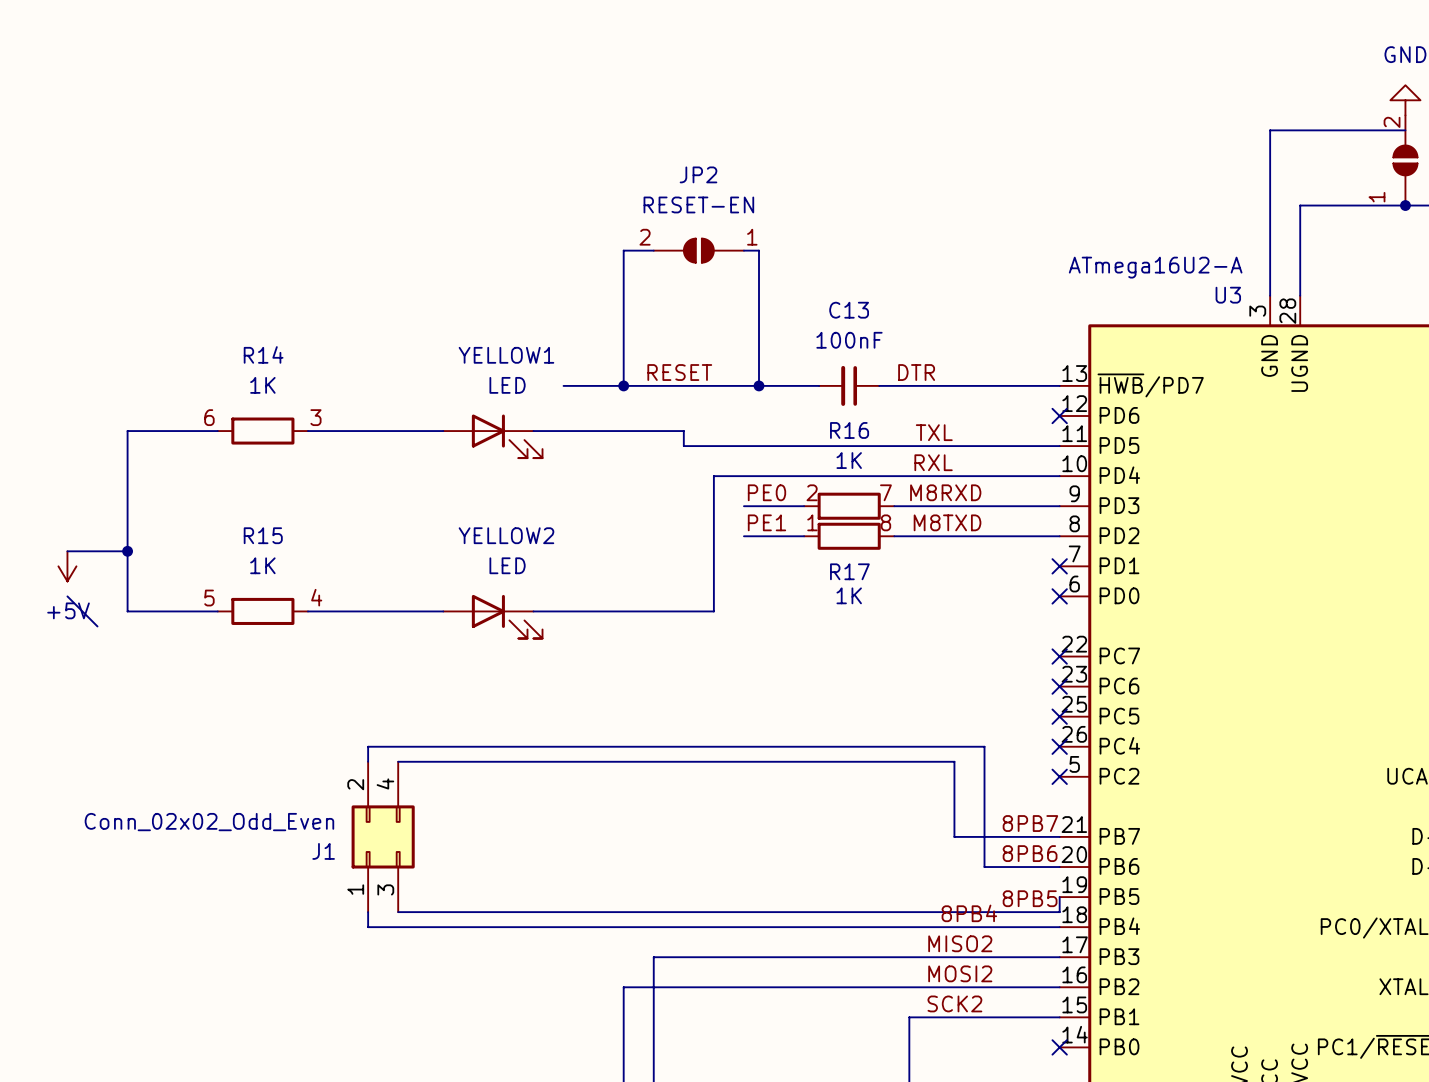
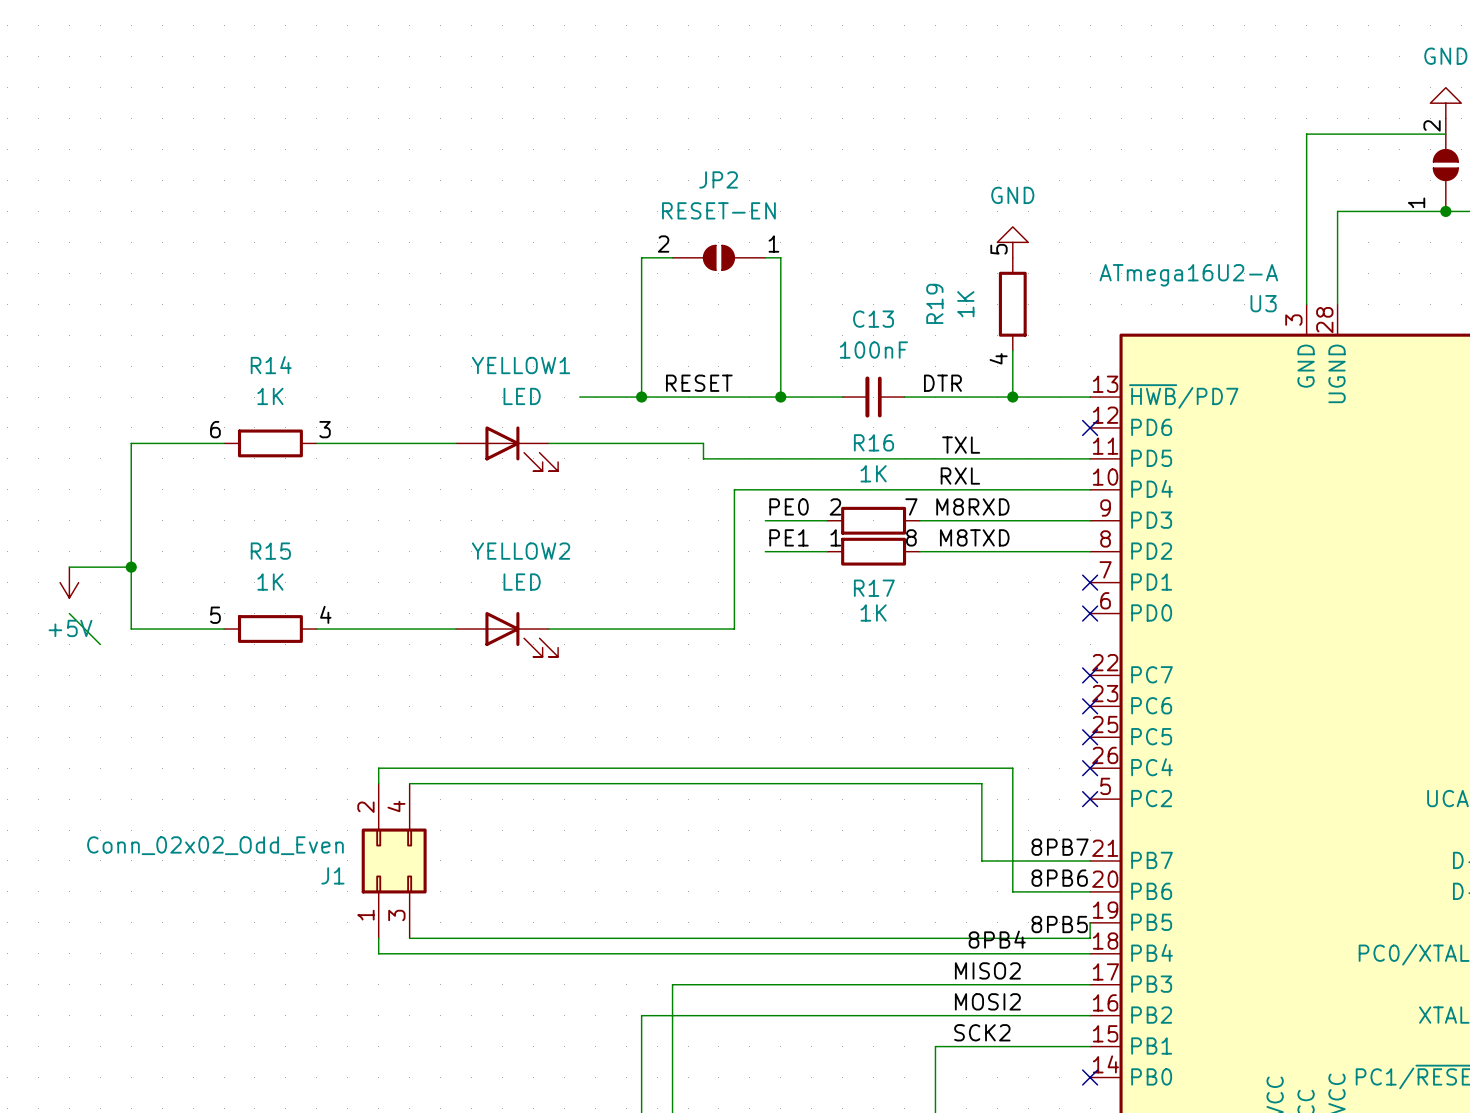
power symbol: none -> GND (1012, 242)
label: none -> 5 (998, 249)
R19: none -> 1K (1012, 304)
wire: none -> (1012, 350) (1012, 397)
label: none -> 4 (998, 358)
junction: none -> (1012, 397)

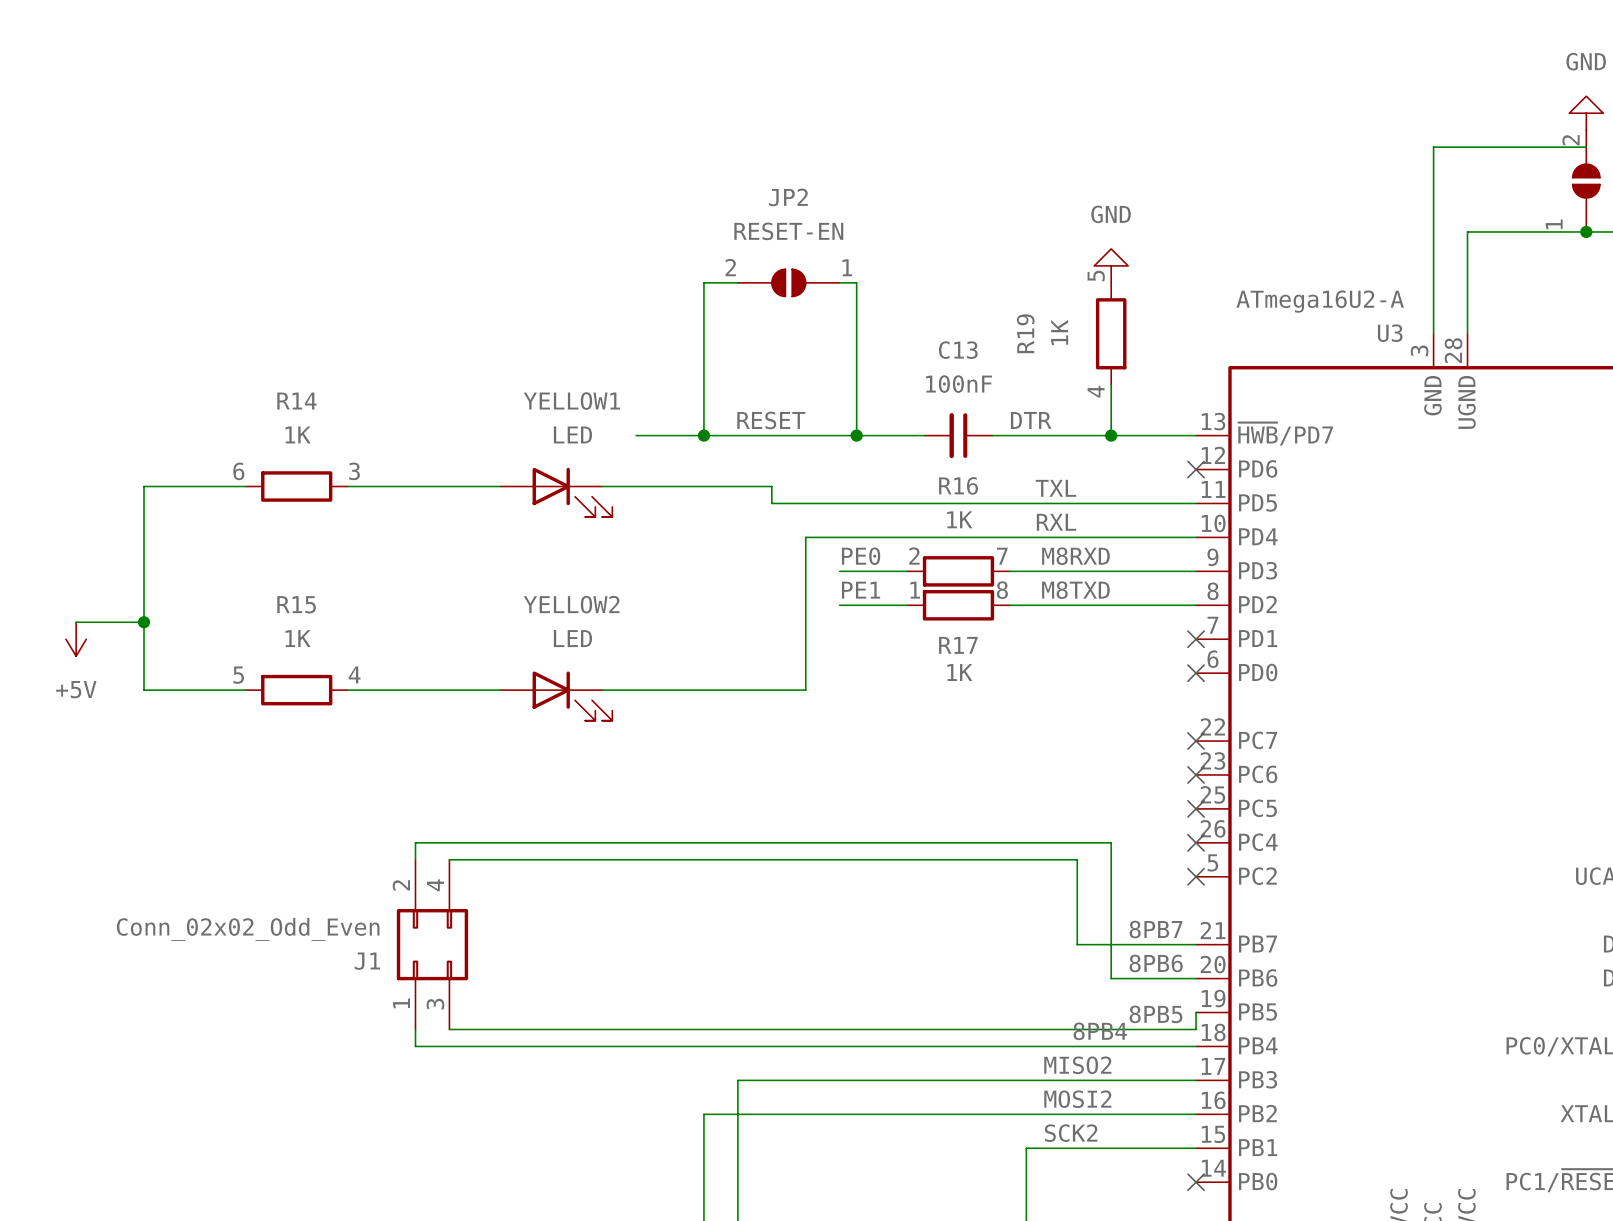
wire: (69, 613) (100, 644) -> none

